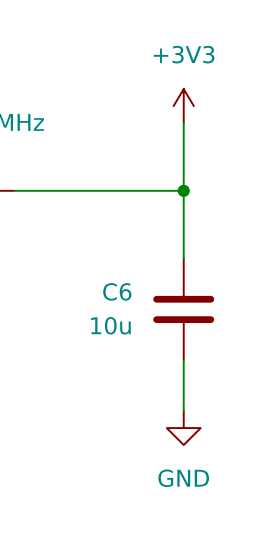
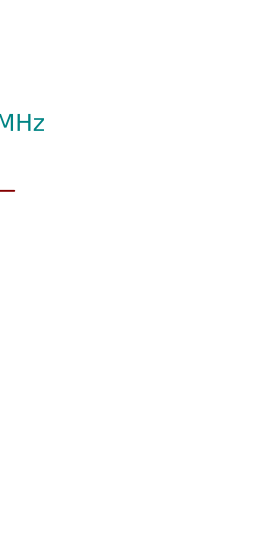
power symbol: +3V3 (183, 106) -> none
wire: (183, 123) (183, 258) -> none
wire: (14, 190) (183, 190) -> none
junction: (183, 190) -> none
C6: 10u (183, 309) -> none
wire: (183, 360) (183, 411) -> none
power symbol: GND (183, 428) -> none

